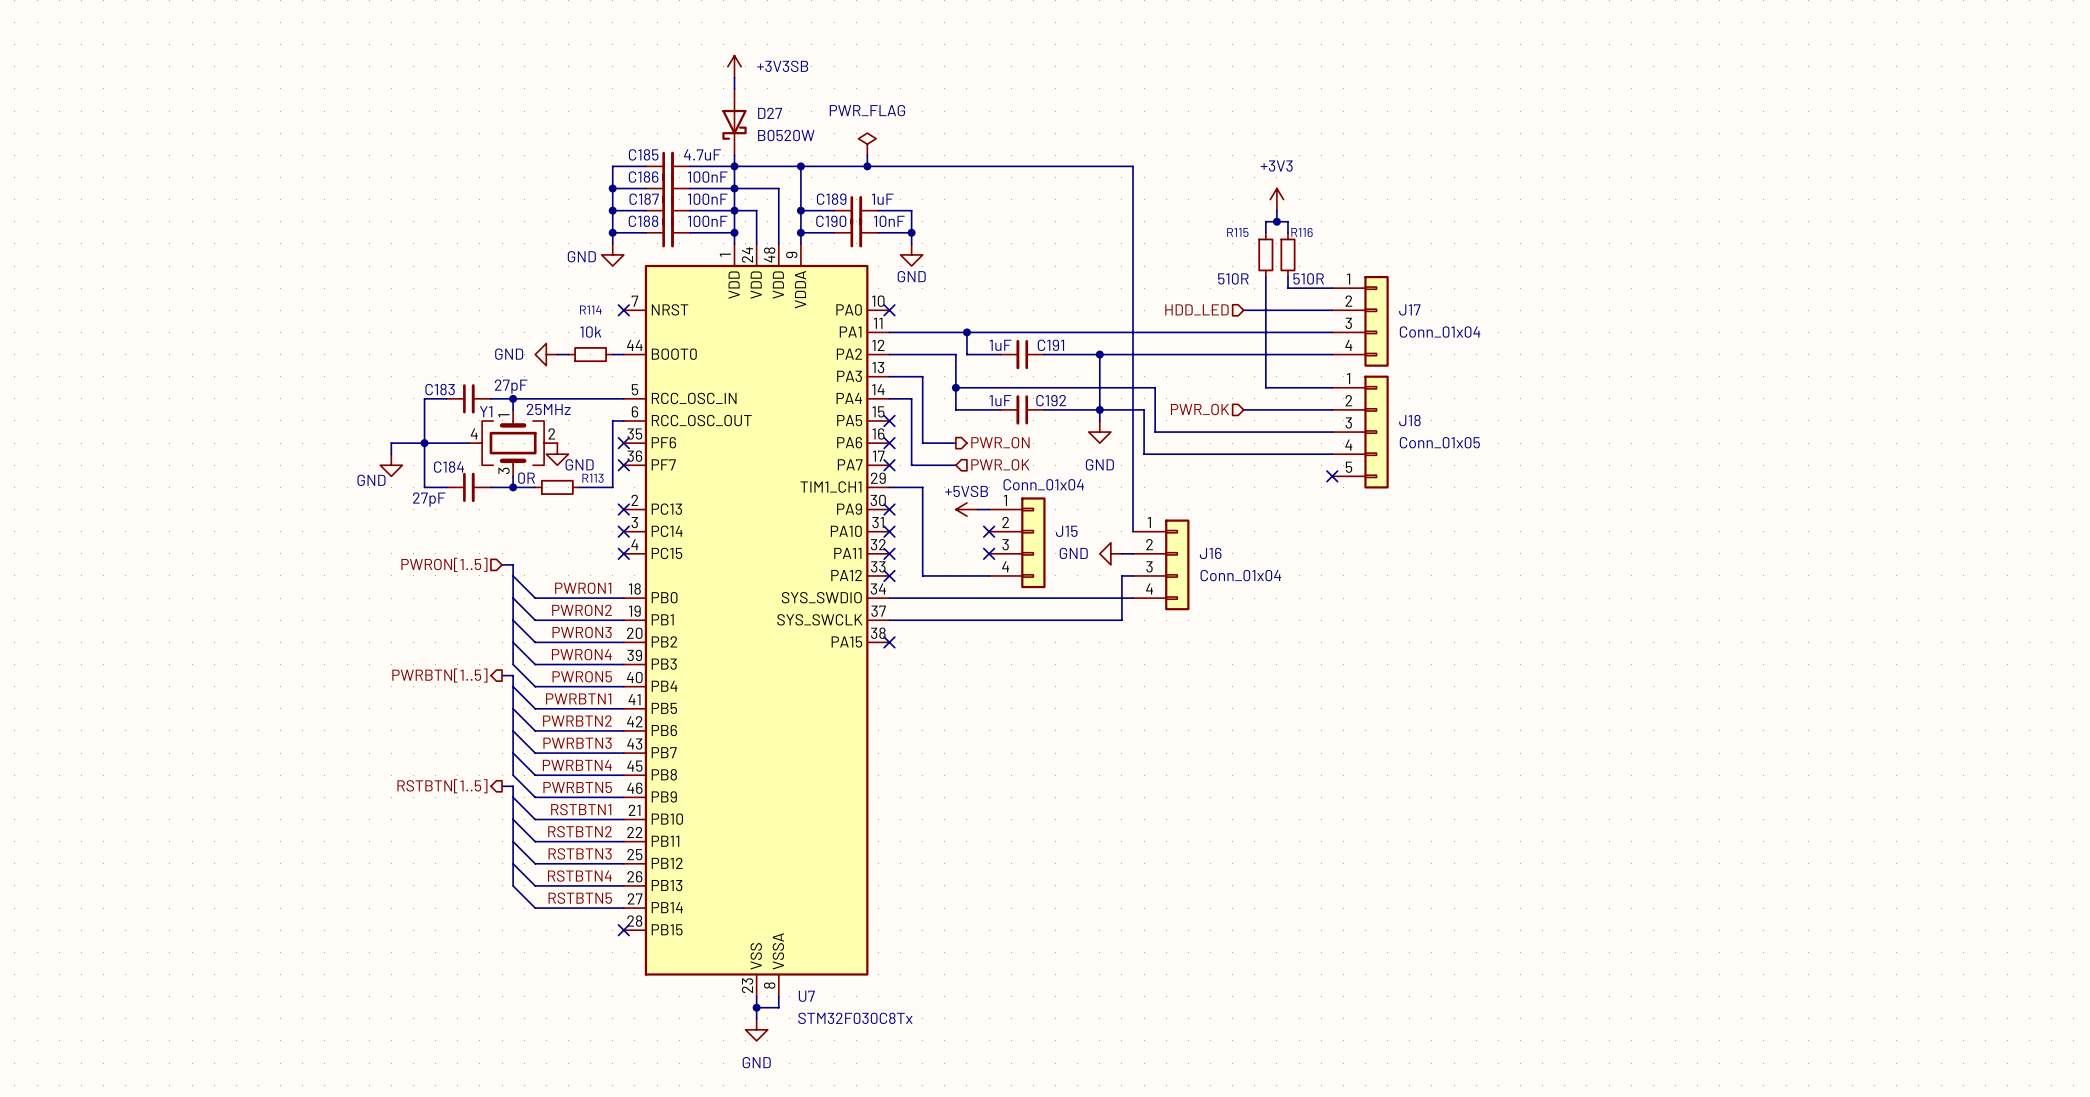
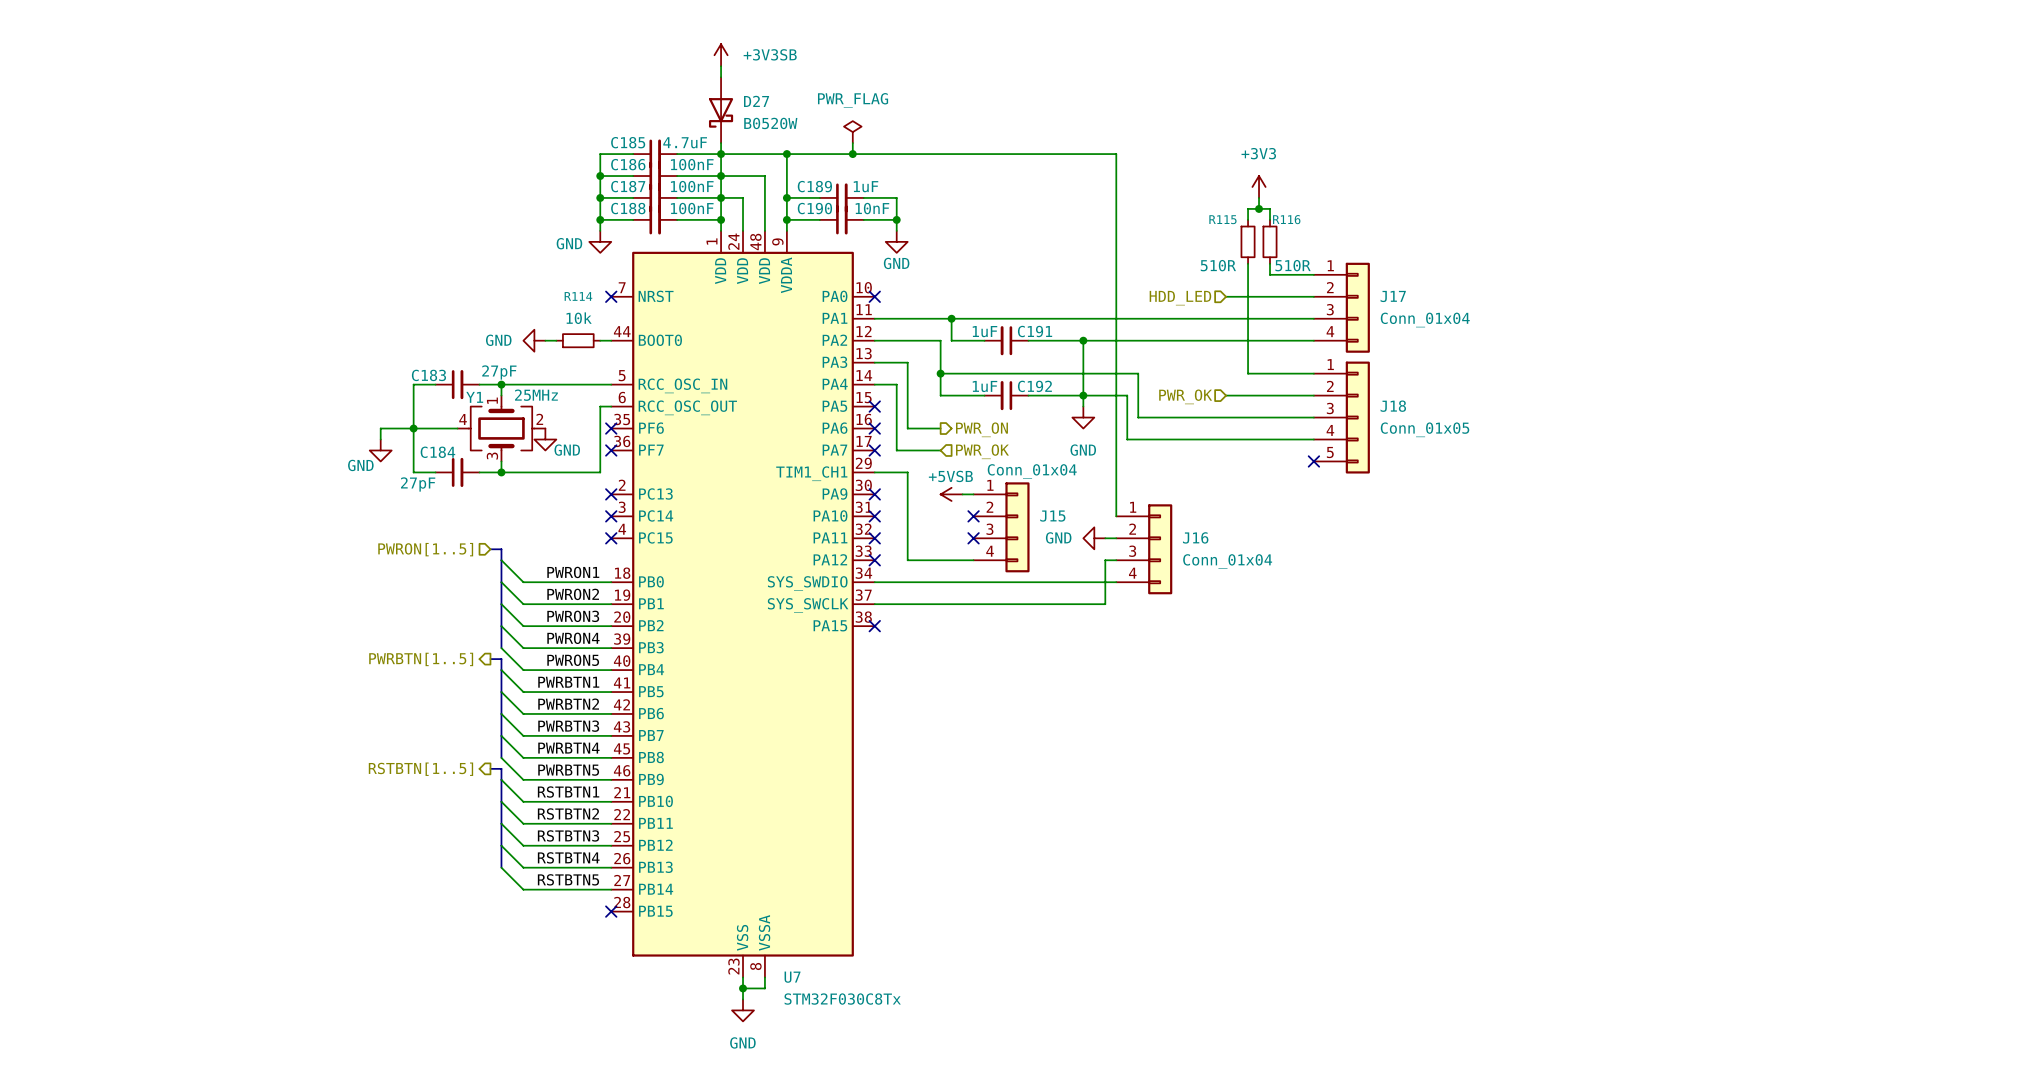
wire: none -> (523, 472) (567, 472)
R113: 0R (557, 487) -> none

